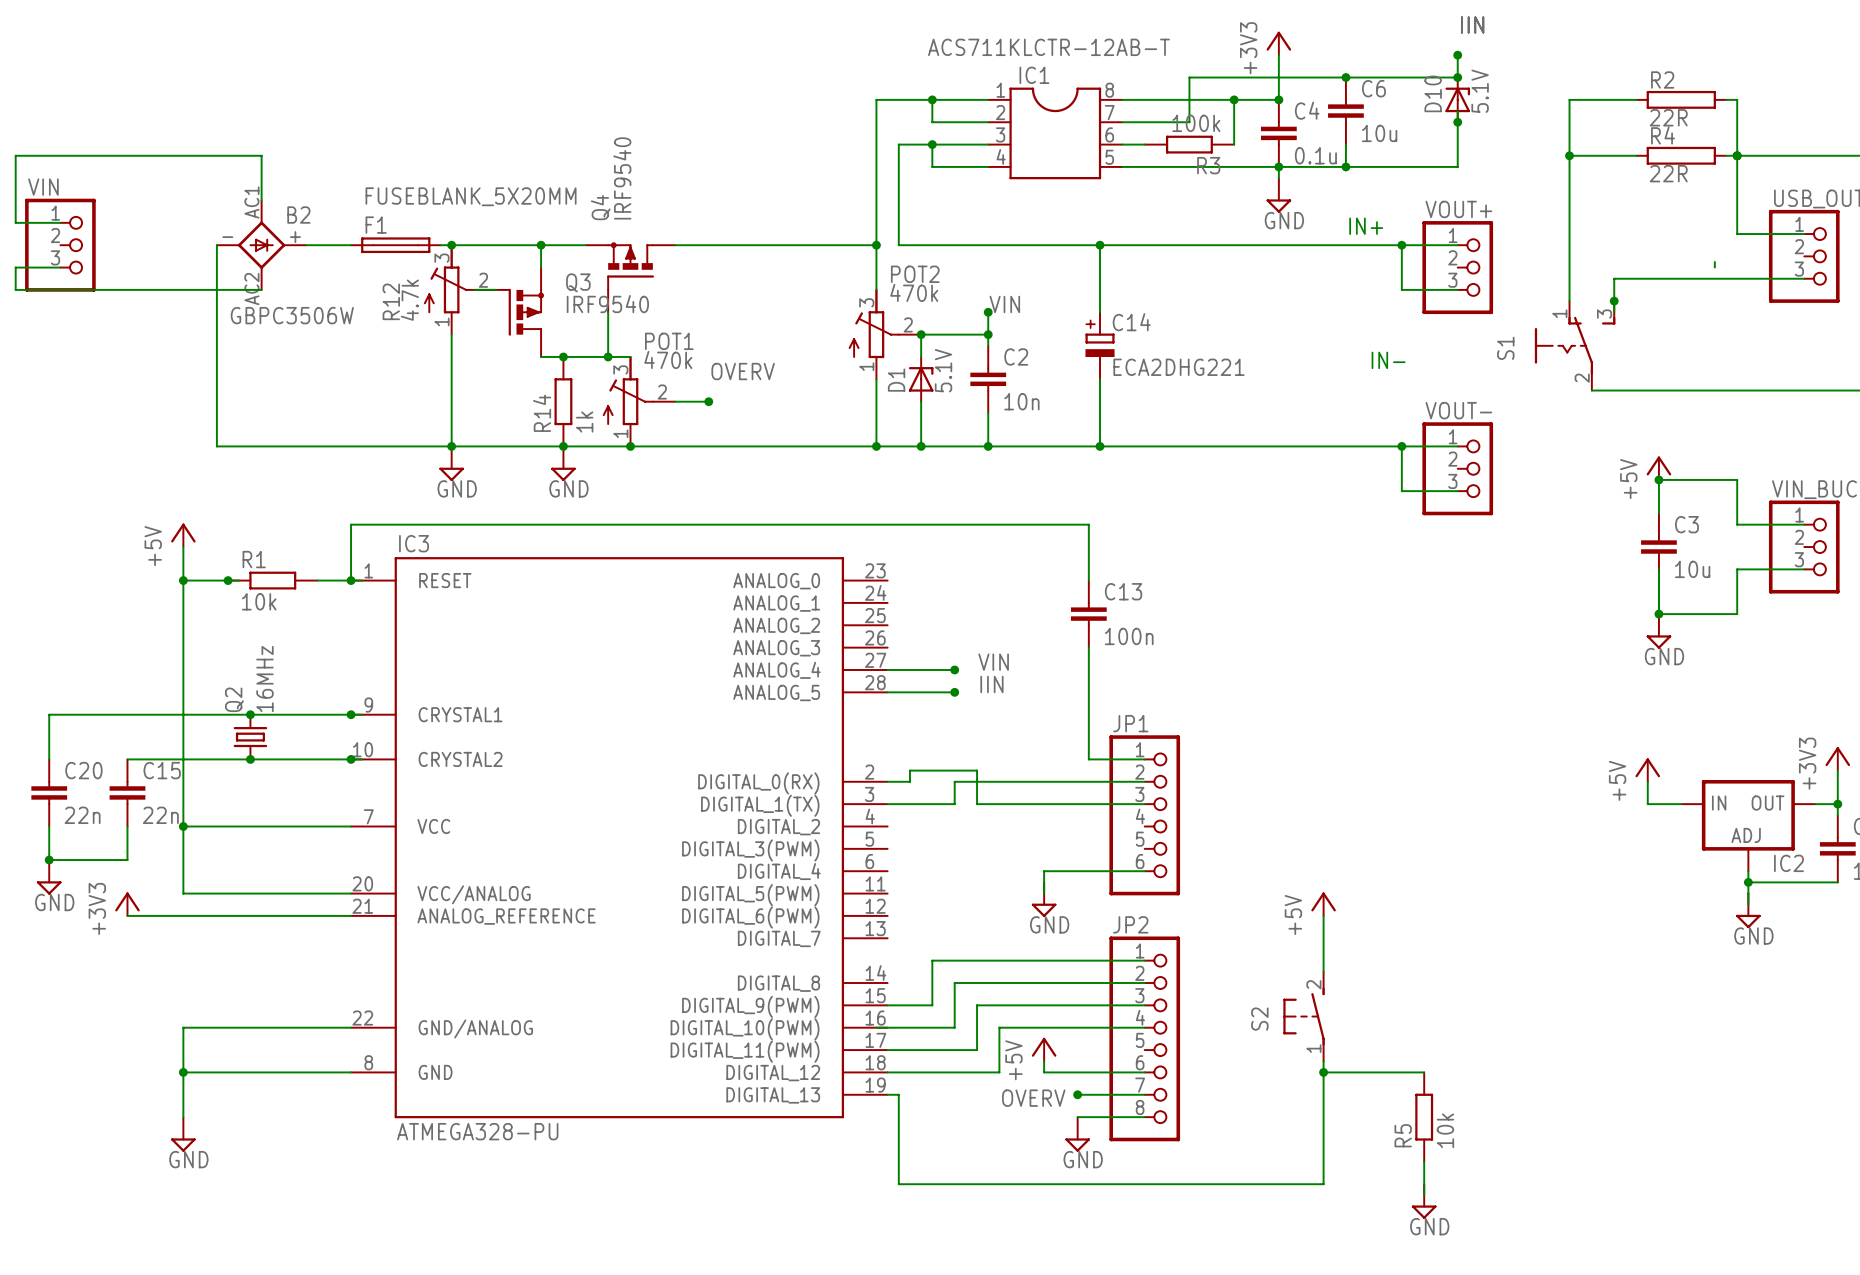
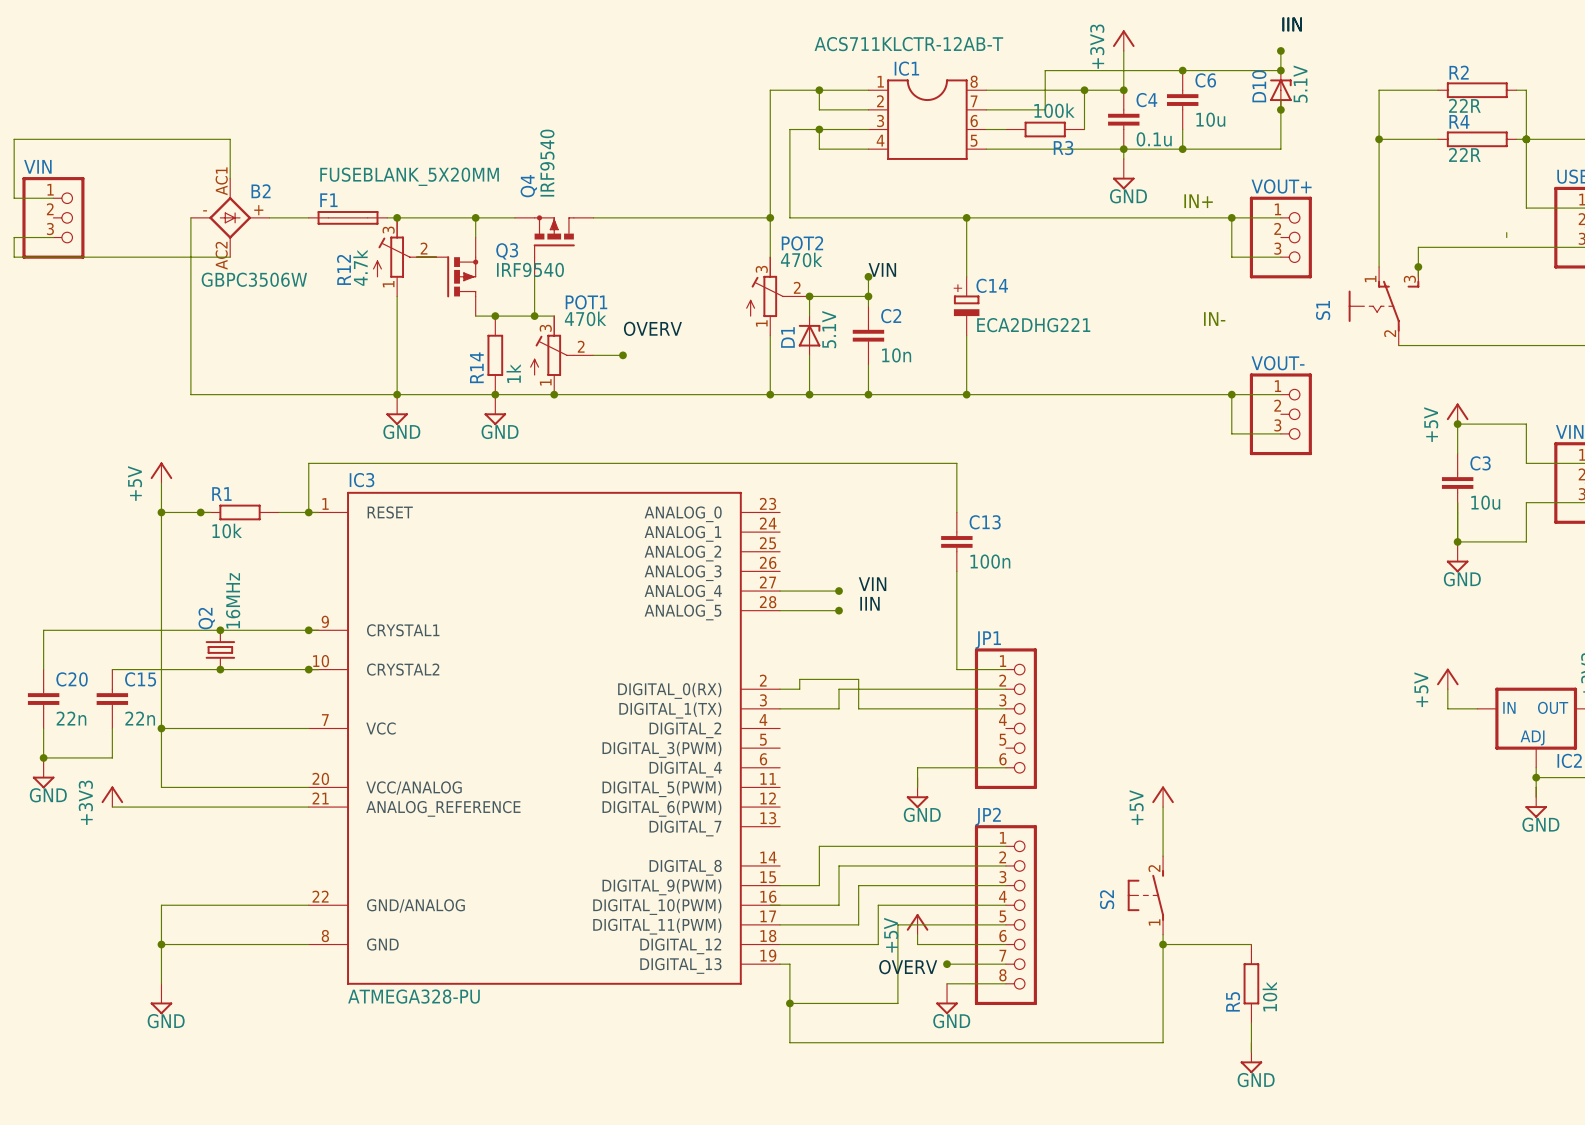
wire: none -> (1005, 924) (897, 924) (897, 1003) (789, 1003)
junction: none -> (789, 1003)

